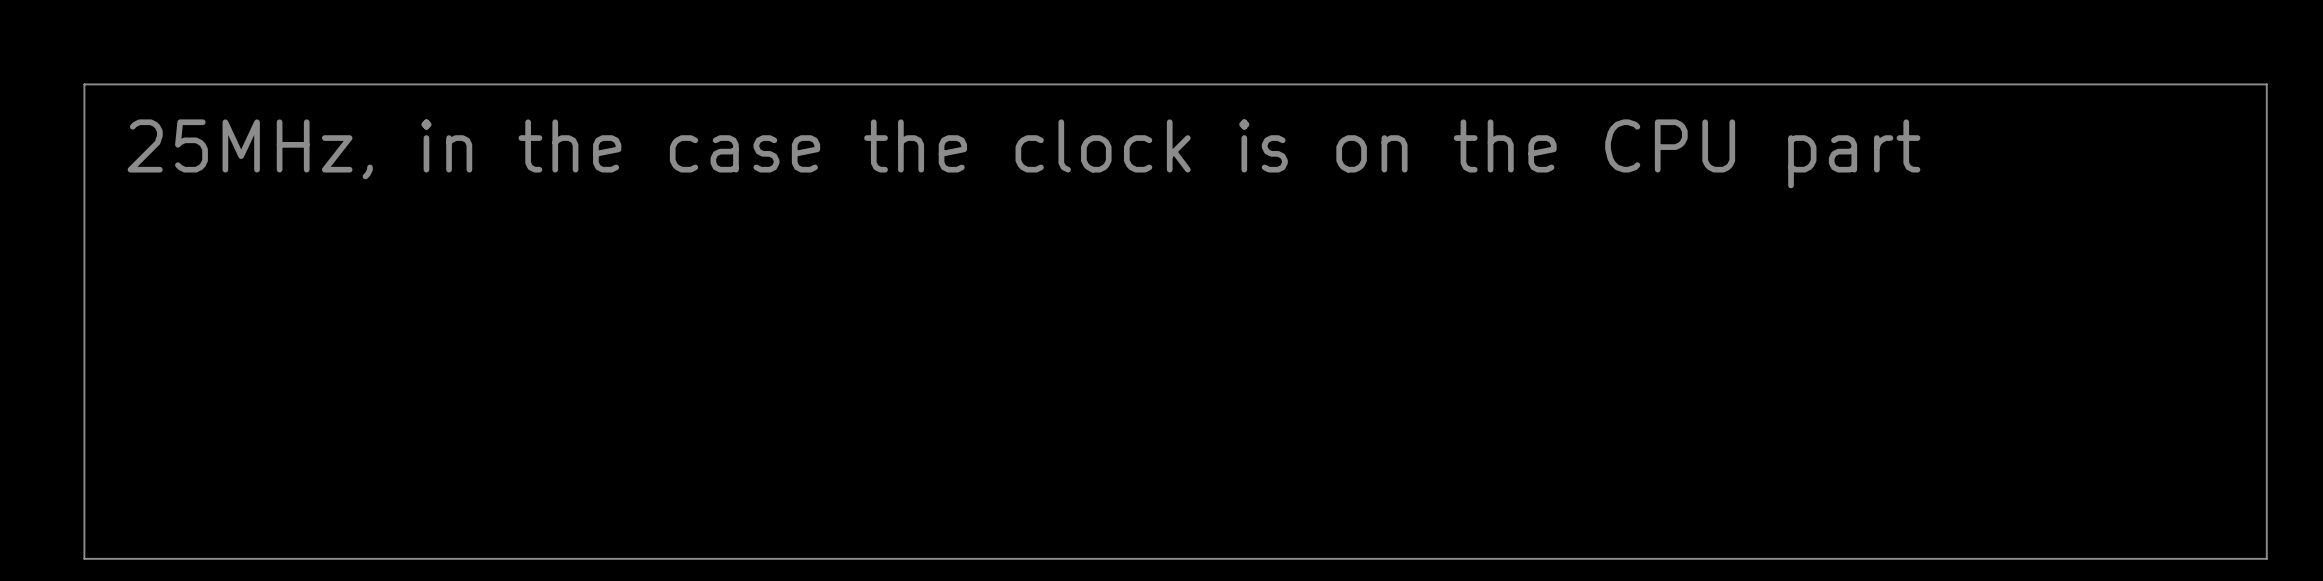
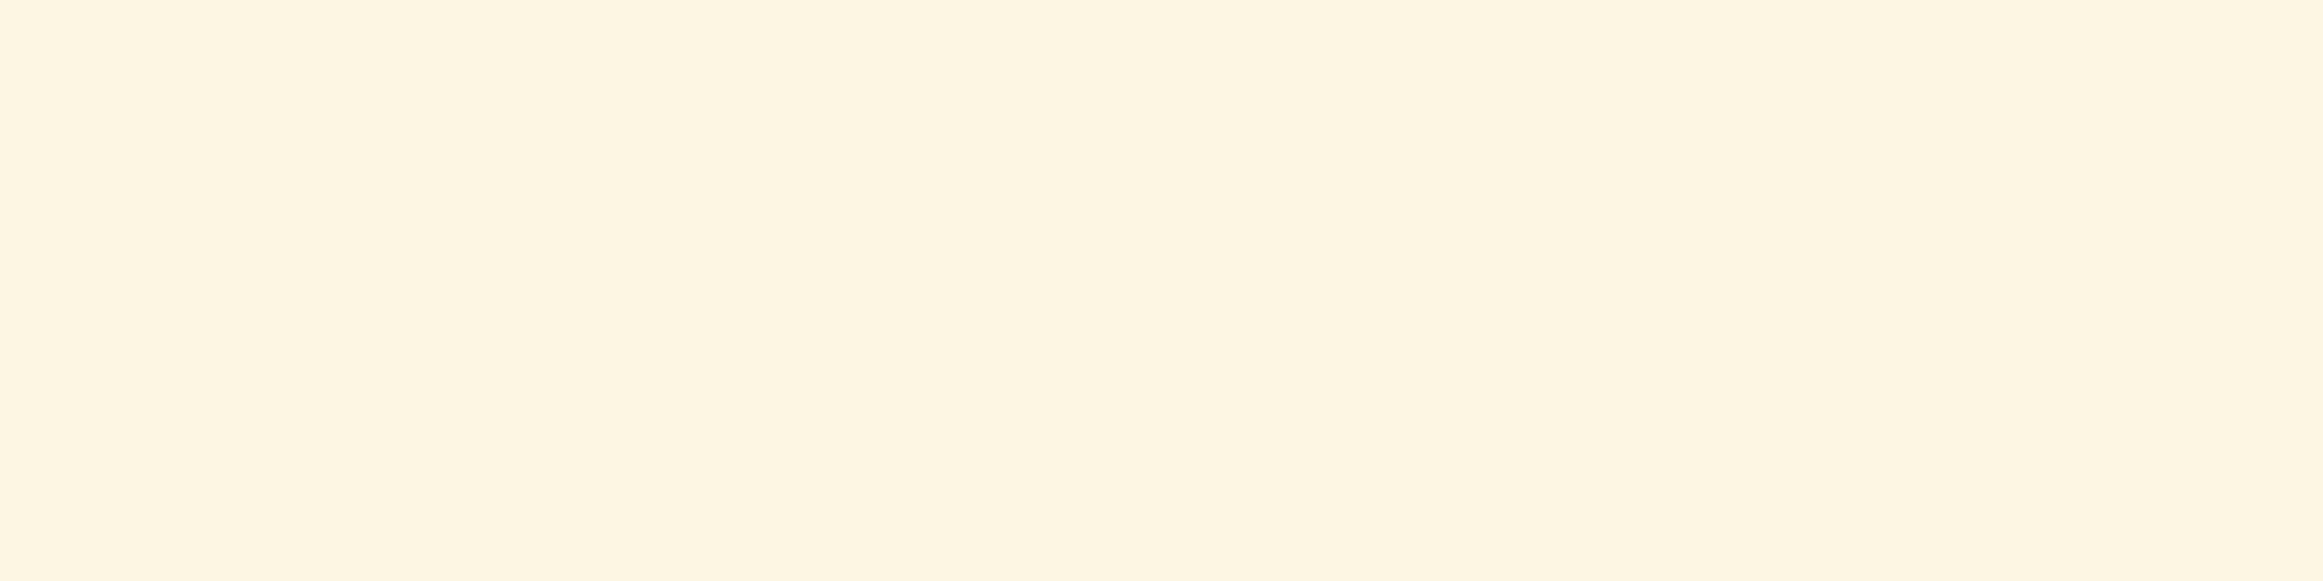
line: (84, 84) (2266, 84) (2266, 558) (84, 558) (84, 84) -> none
text: 25MHz, in the case the clock is on the CPU part (1024, 153) -> none

